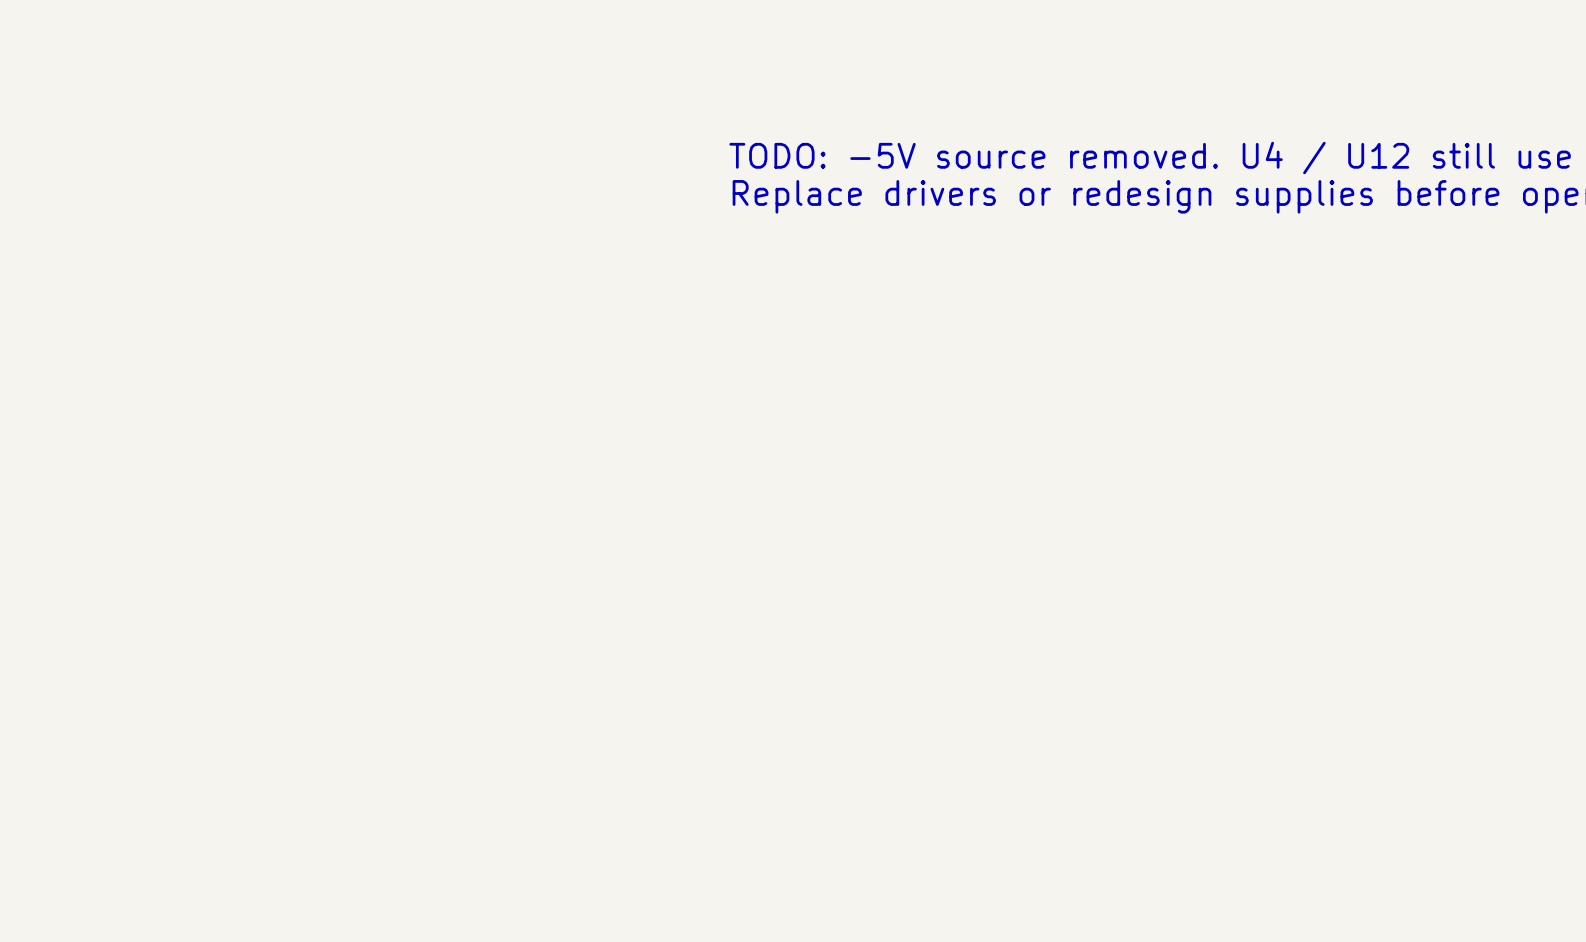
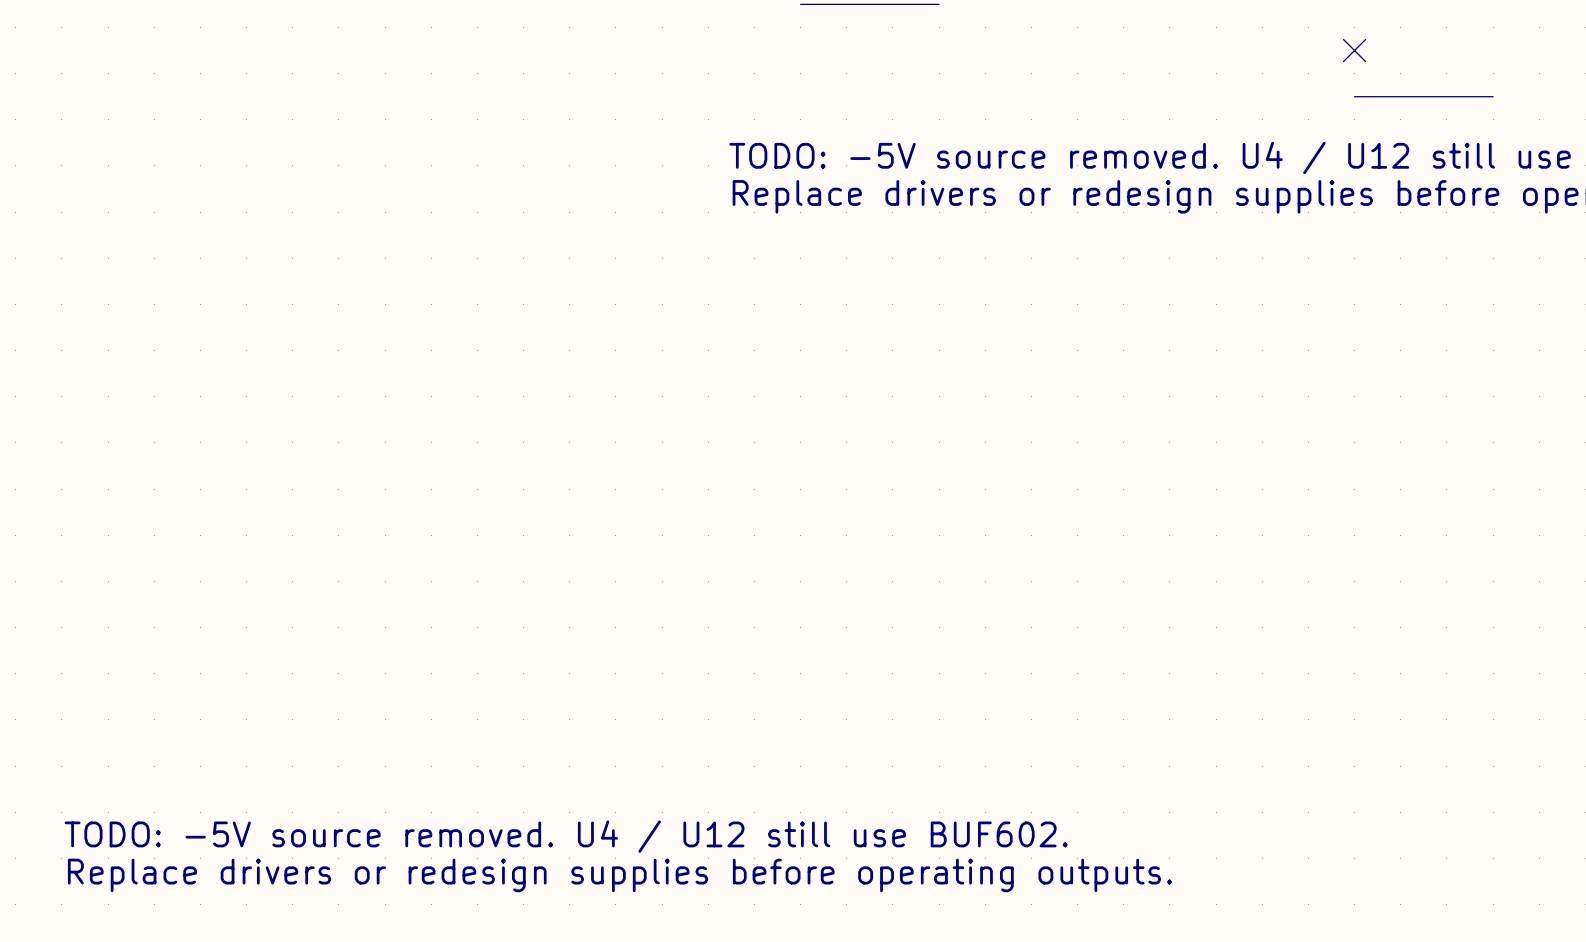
wire: none -> (800, 4) (939, 4)
no-connect mark: none -> (1354, 50)
wire: none -> (1354, 96) (1493, 96)
text: none -> TODO: -5V source removed. U4 / U12 still use BUF602. (566, 836)
text: none -> Replace drivers or redesign supplies before operating outputs. (619, 875)

